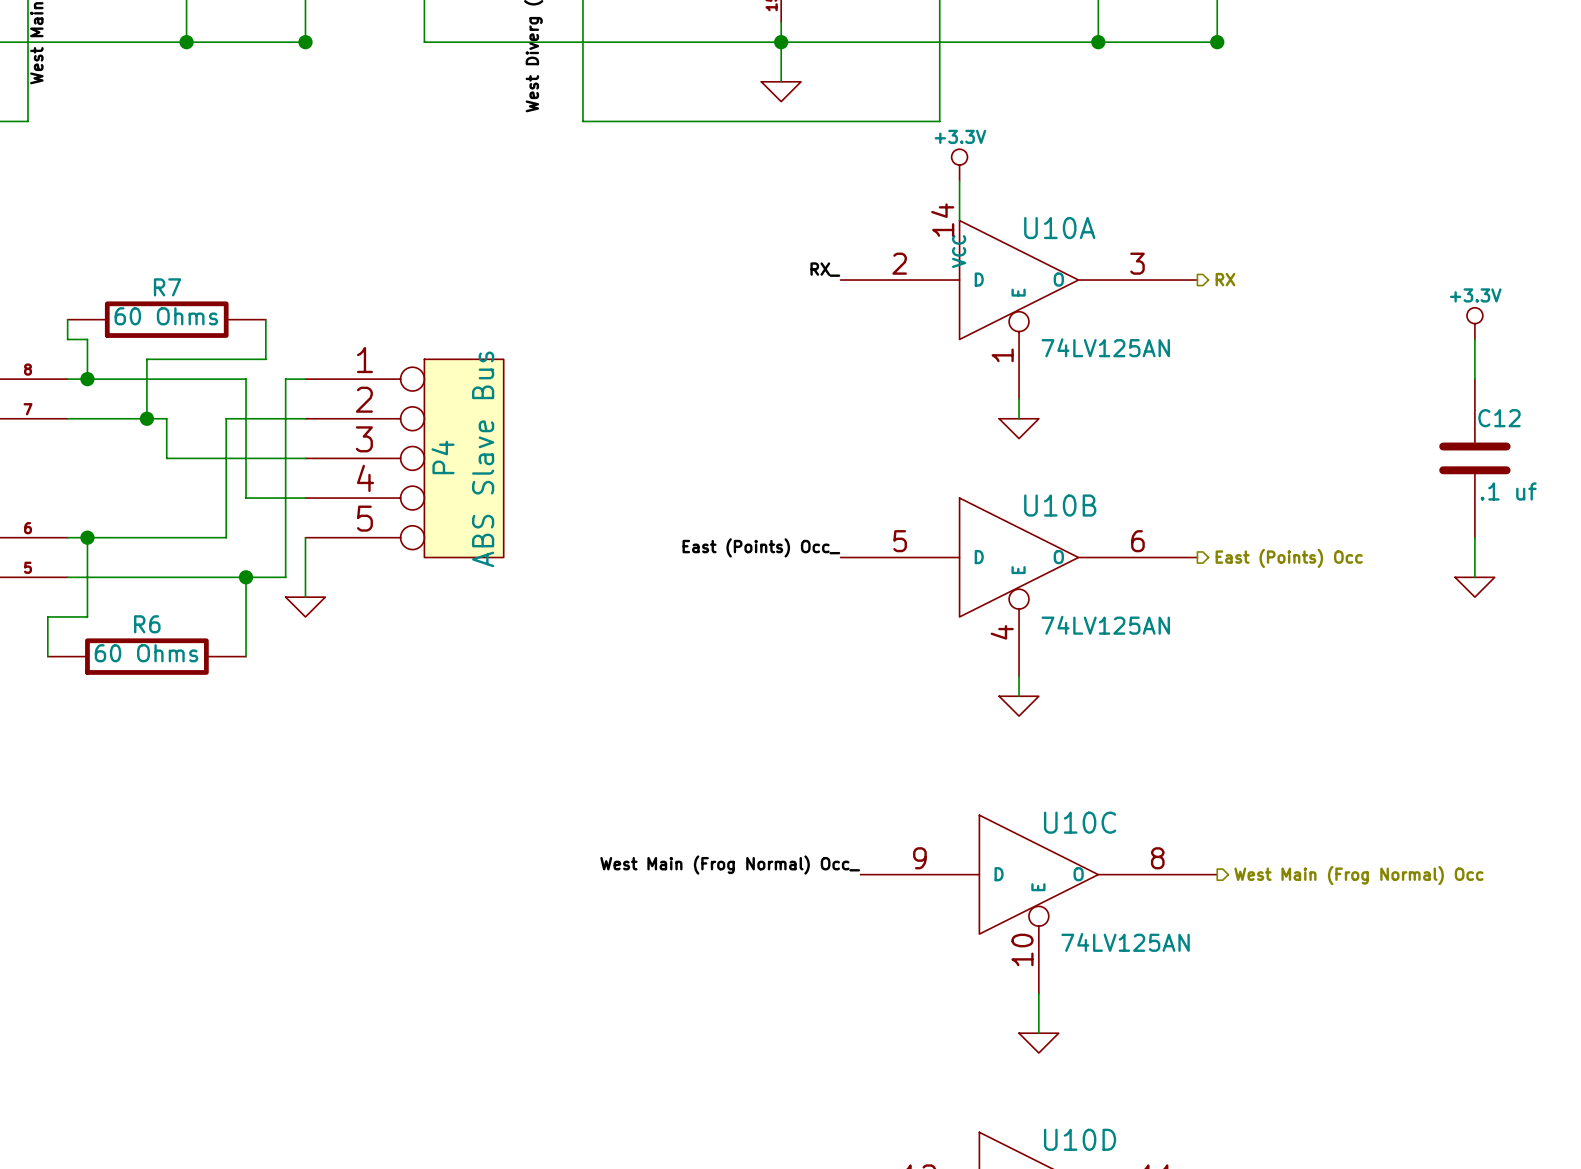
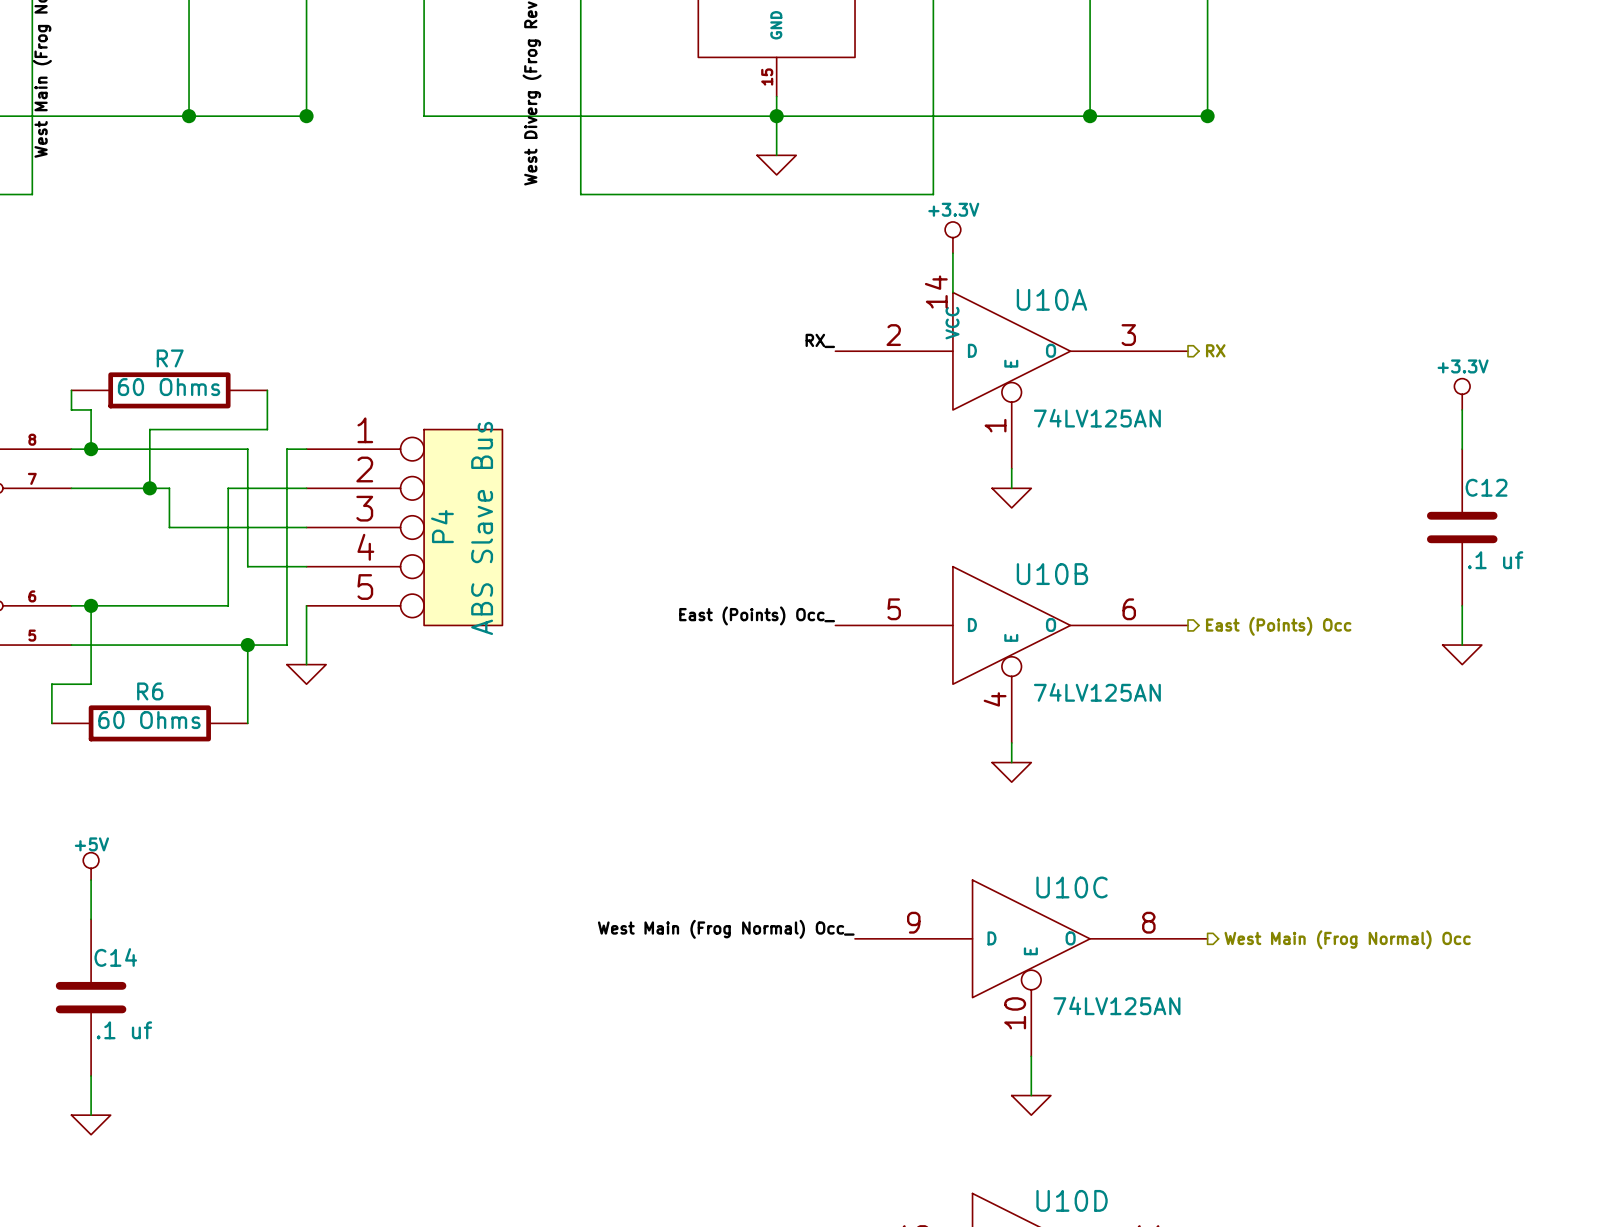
power symbol: none -> +5V (91, 866)
wire: none -> (91, 880) (91, 919)
C14: none -> .1 uf (91, 997)
wire: none -> (91, 1075) (91, 1115)
power symbol: none -> (91, 1124)

